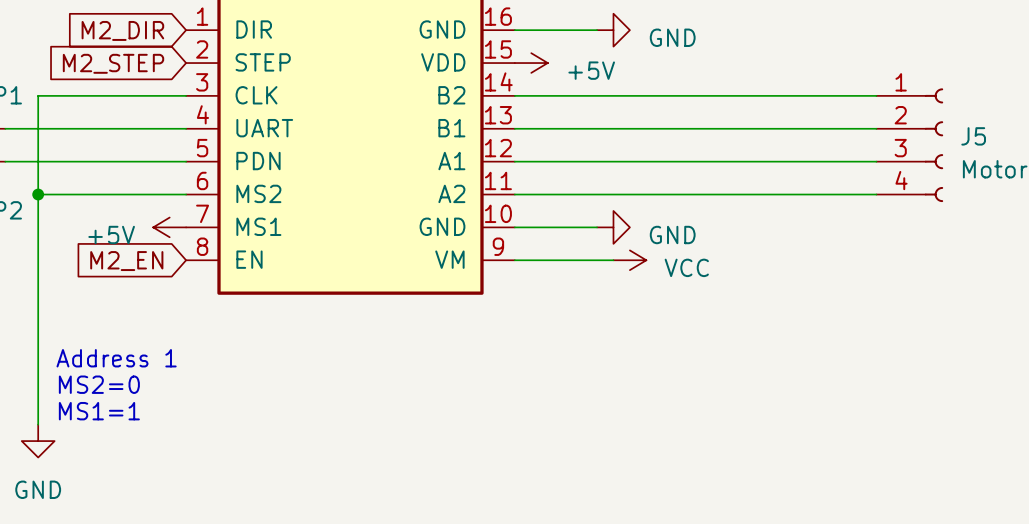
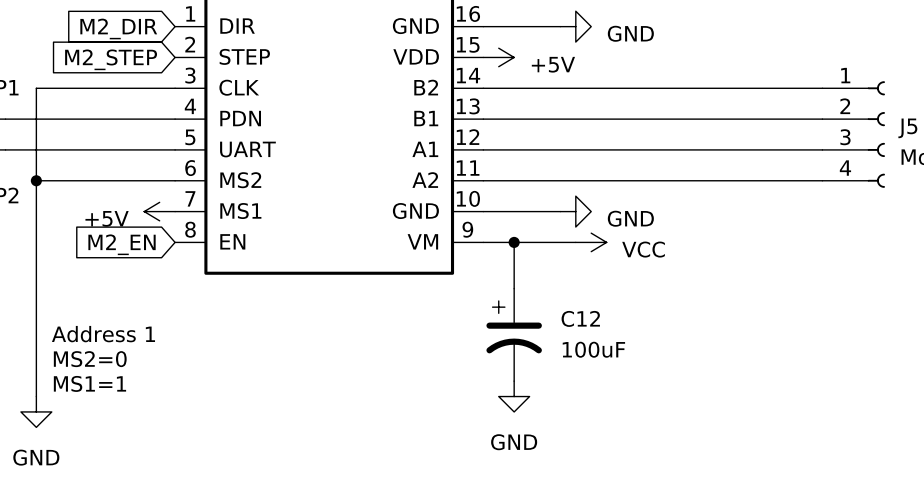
part pin name: UART (264, 128) -> PDN (240, 118)
part pin name: PDN (258, 161) -> UART (247, 149)
wire: none -> (514, 242) (514, 288)
junction: none -> (514, 242)
C12: none -> 100uF (514, 334)
power symbol: none -> GND (514, 396)

